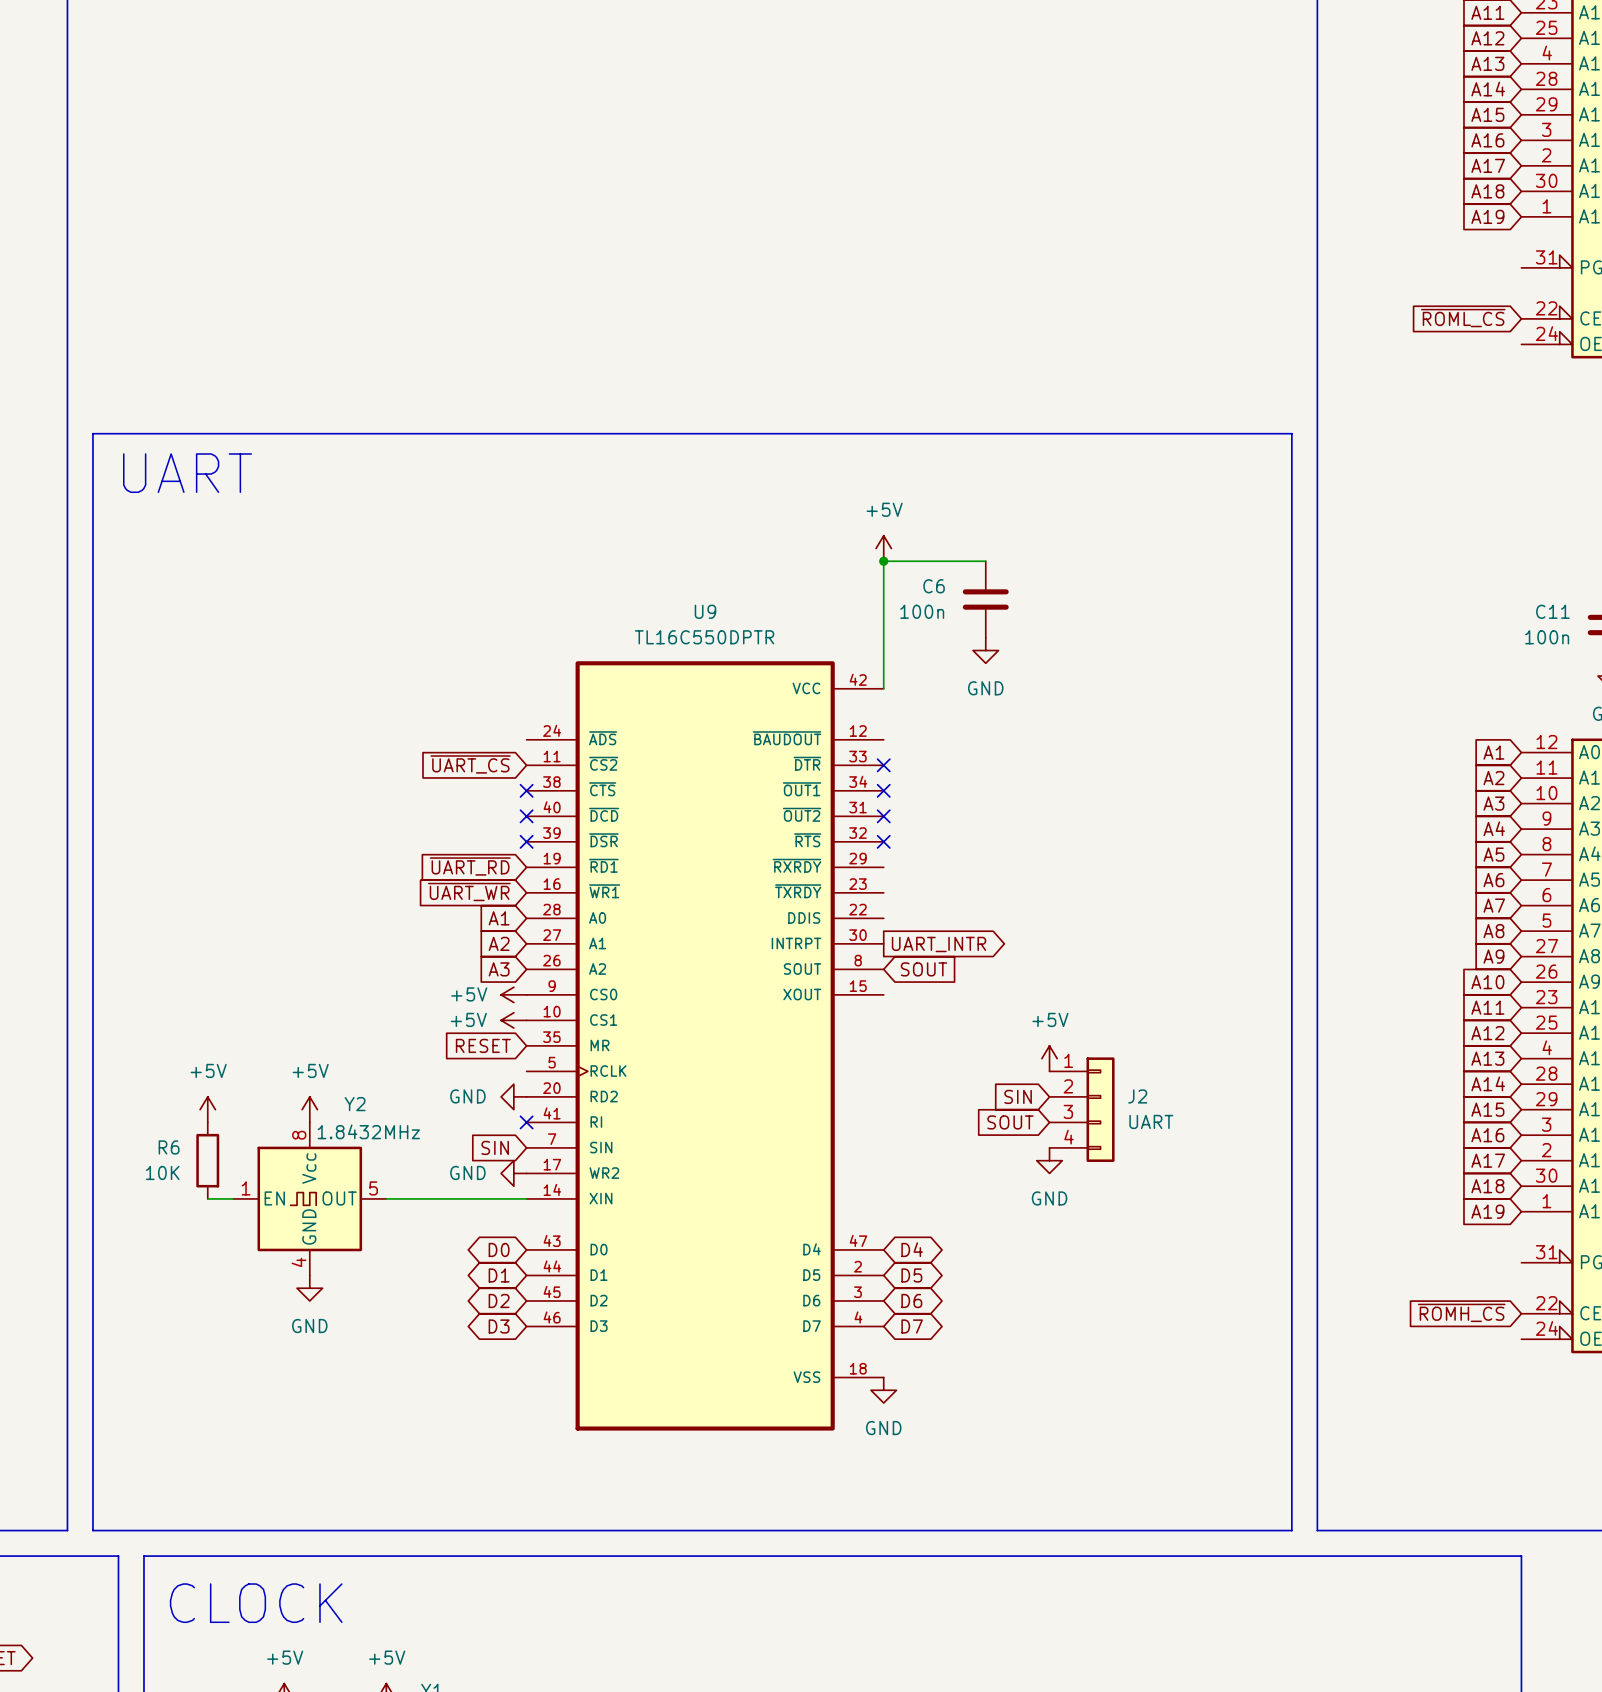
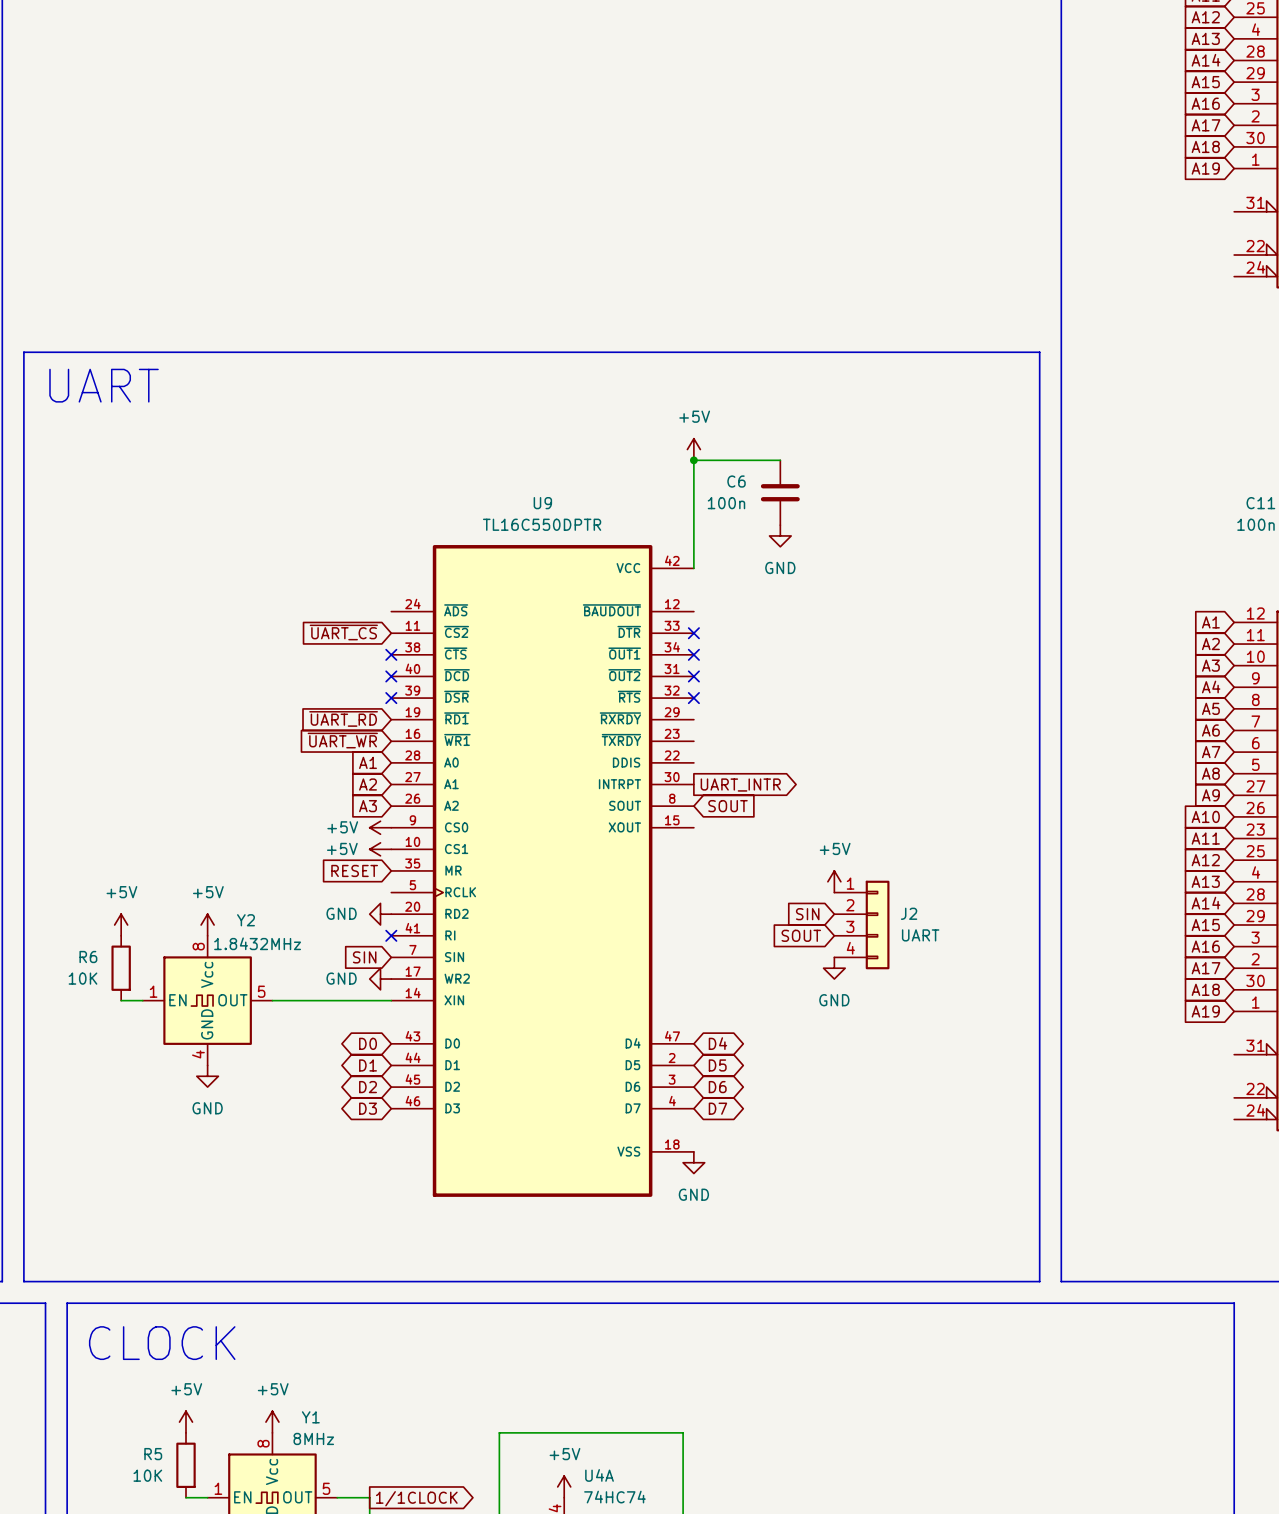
global label: ~{ROML_CS} (1463, 318) -> none
global label: ~{ROMH_CS} (1461, 1312) -> none

